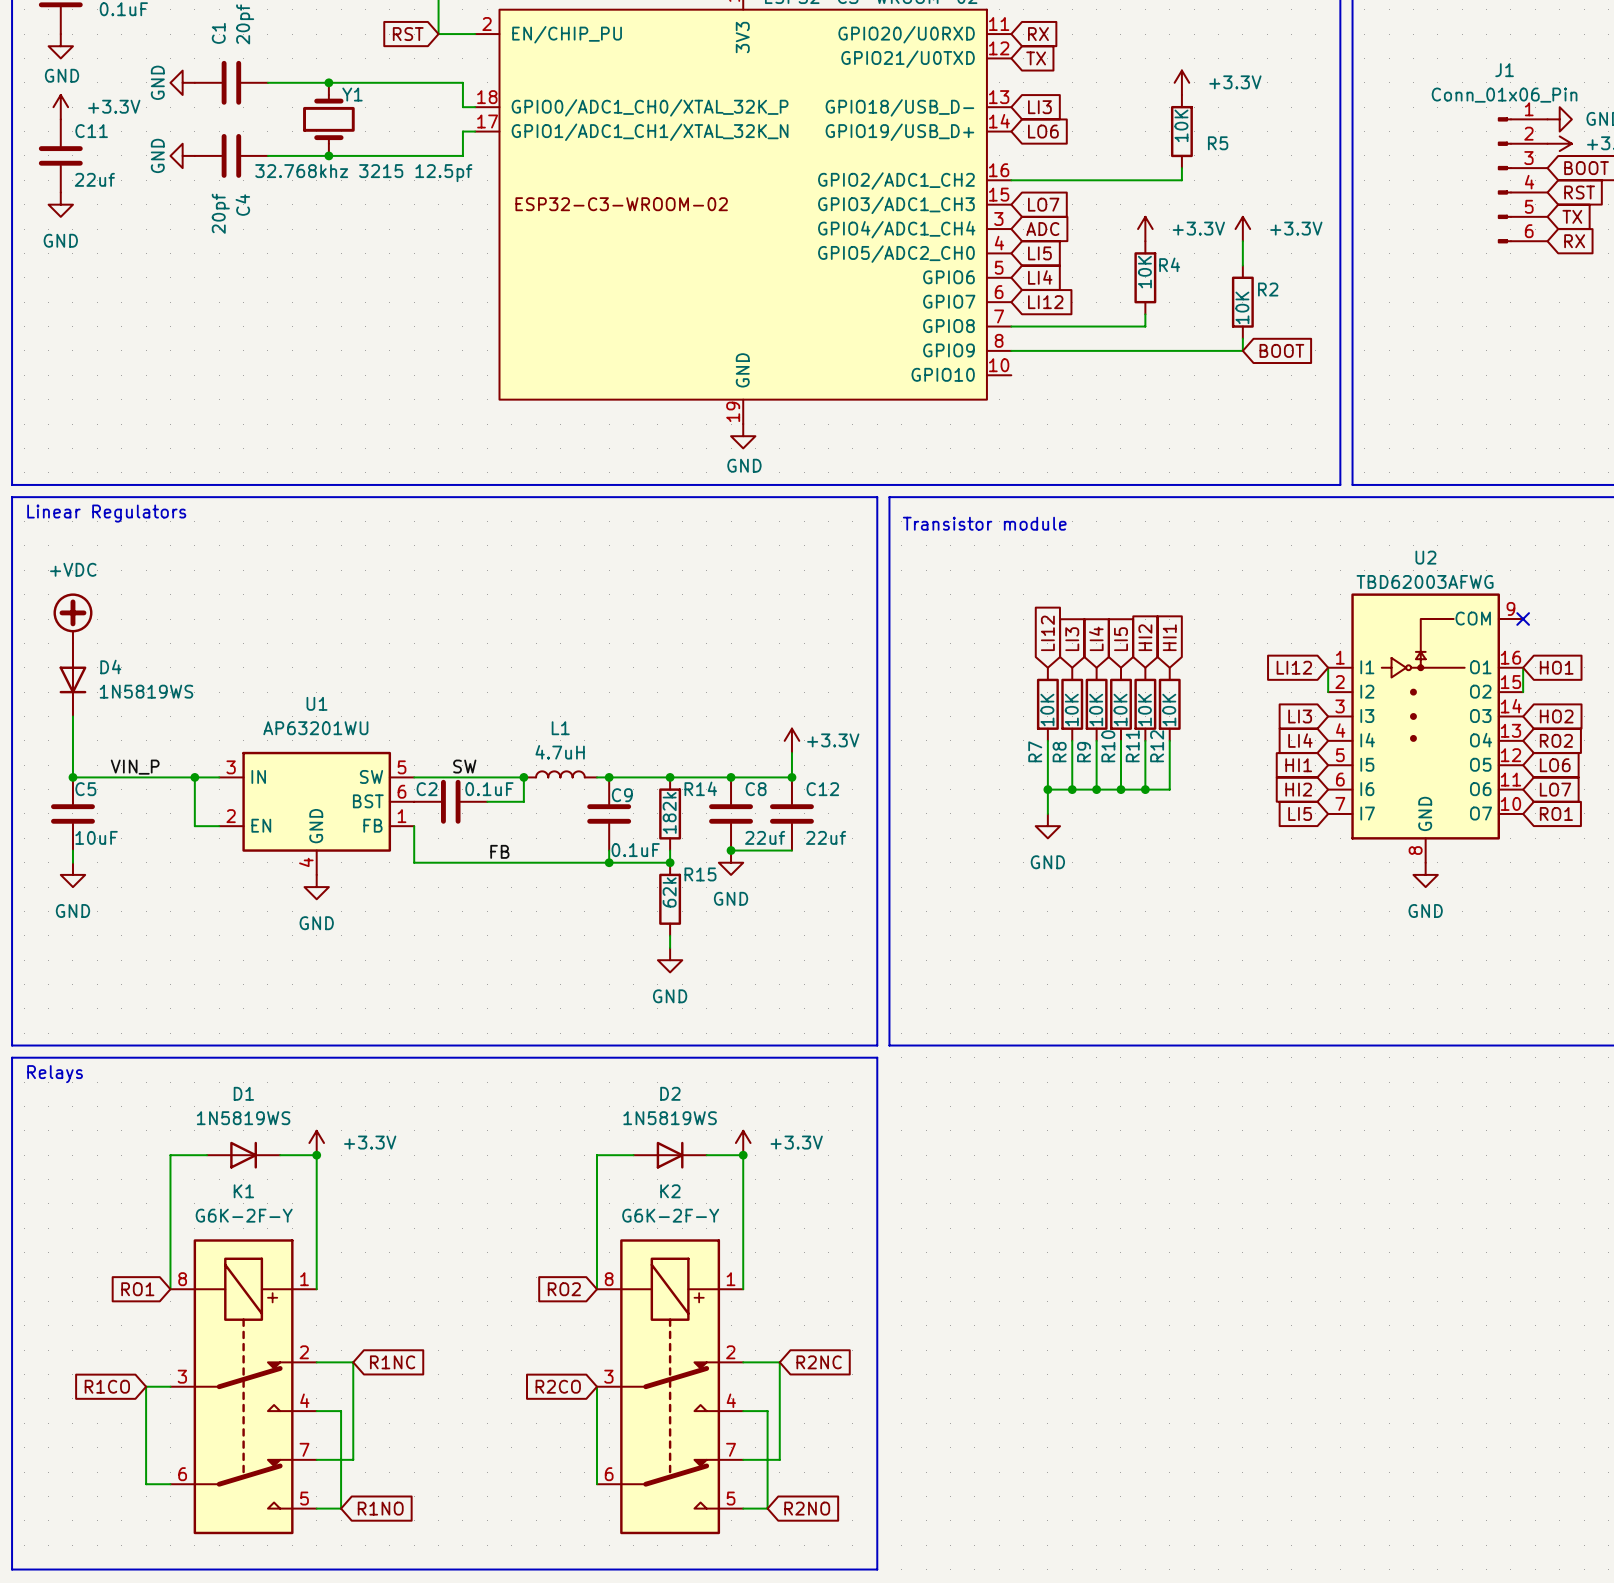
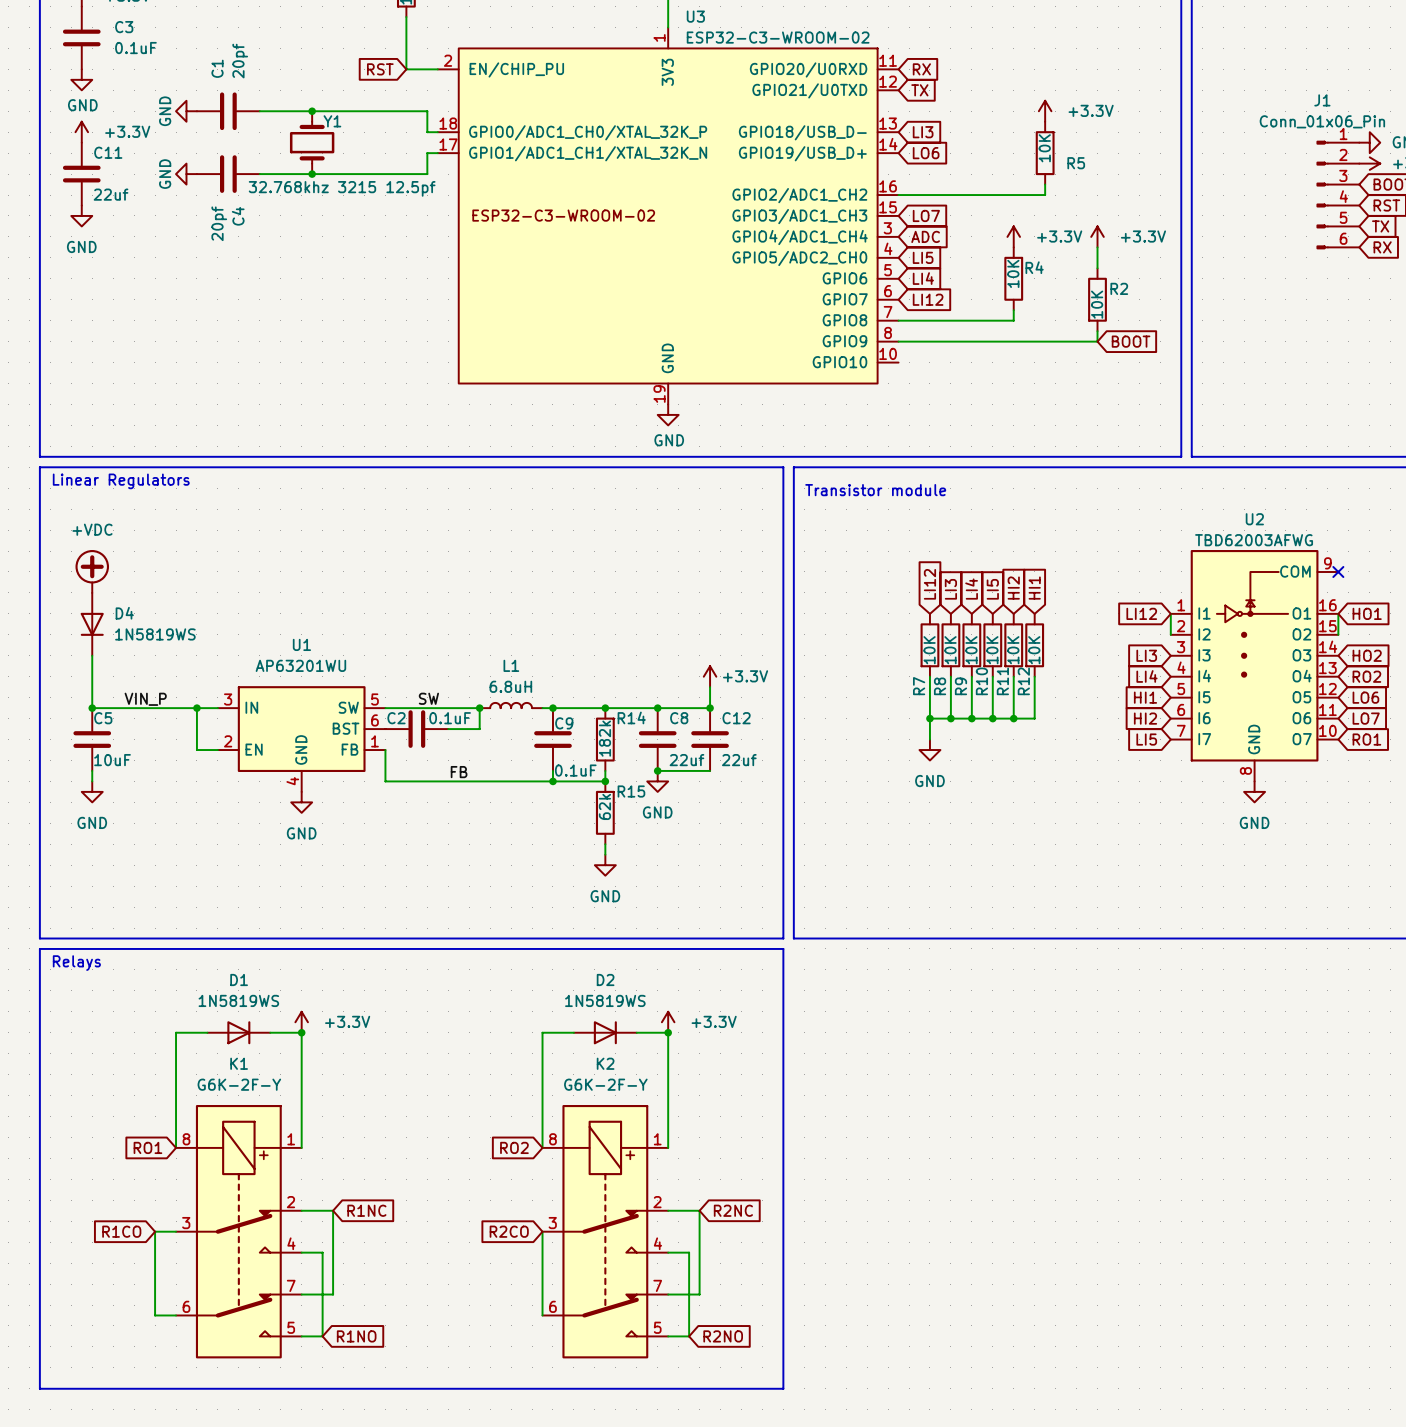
L1 value: 4.7uH (560, 752) -> 6.8uH (510, 686)

